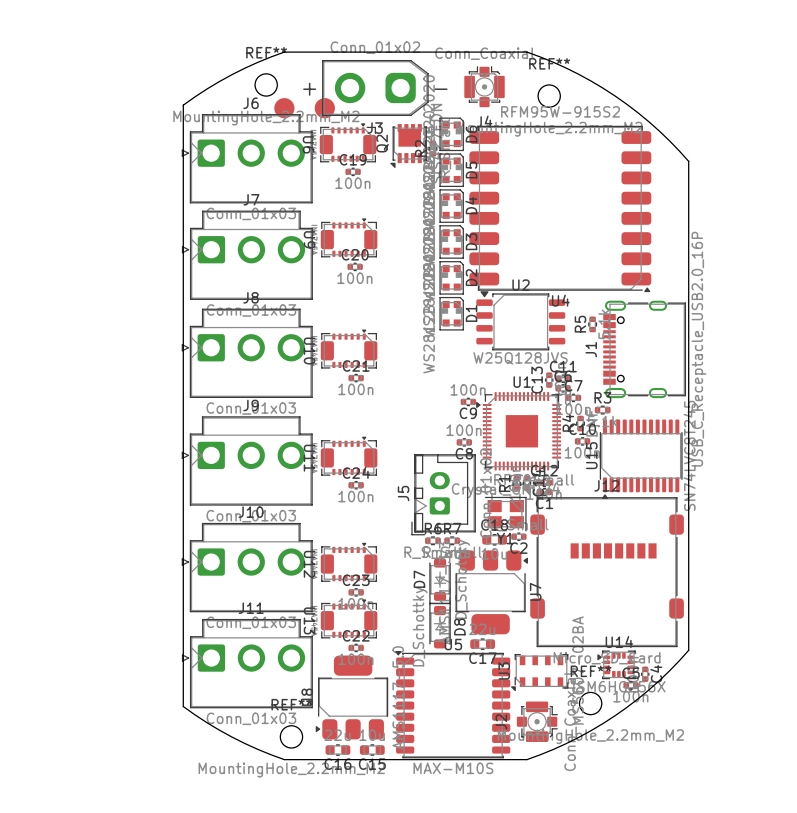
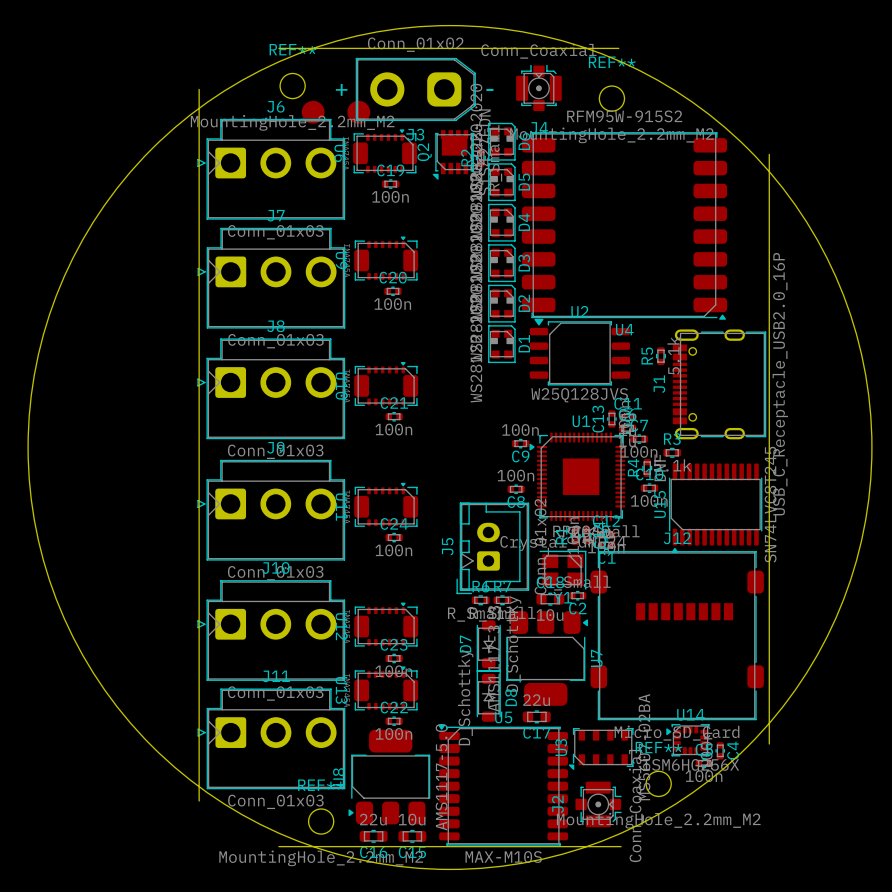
round board edge: none -> [27, 25, 873, 870]
board edge: none -> (278, 48) (618, 48)
board edge: none -> (199, 89) (199, 108)
board edge: (183, 105) (231, 74) (284, 52) (526, 52) (566, 68) (615, 96) (648, 121) (688, 161) -> (769, 154) (769, 172)
board edge: (688, 650) (659, 680) (615, 715) (578, 737) (526, 759) (284, 759) (231, 736) (183, 706) -> (769, 723) (769, 743)
board edge: none -> (199, 787) (199, 801)
board edge: none -> (278, 846) (621, 846)

